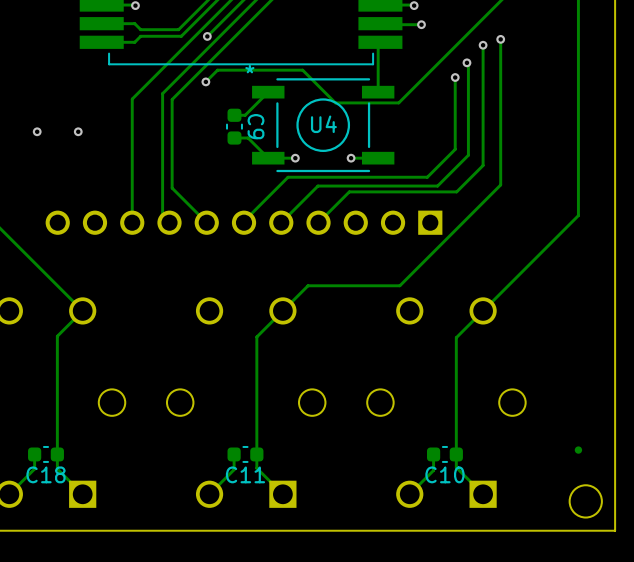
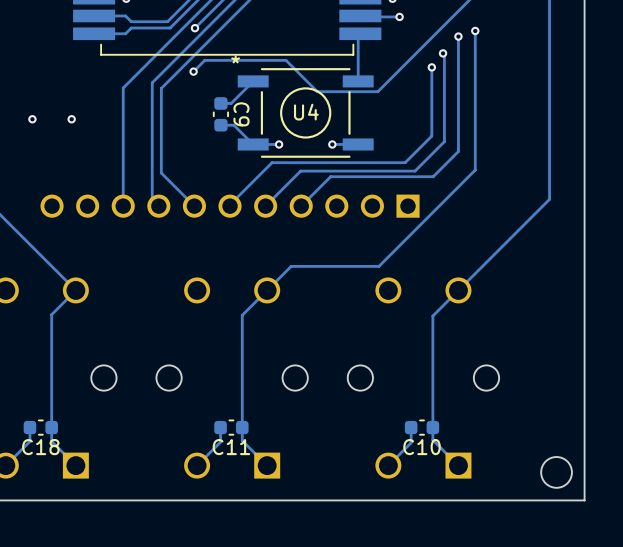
part: (578, 450) -> none

